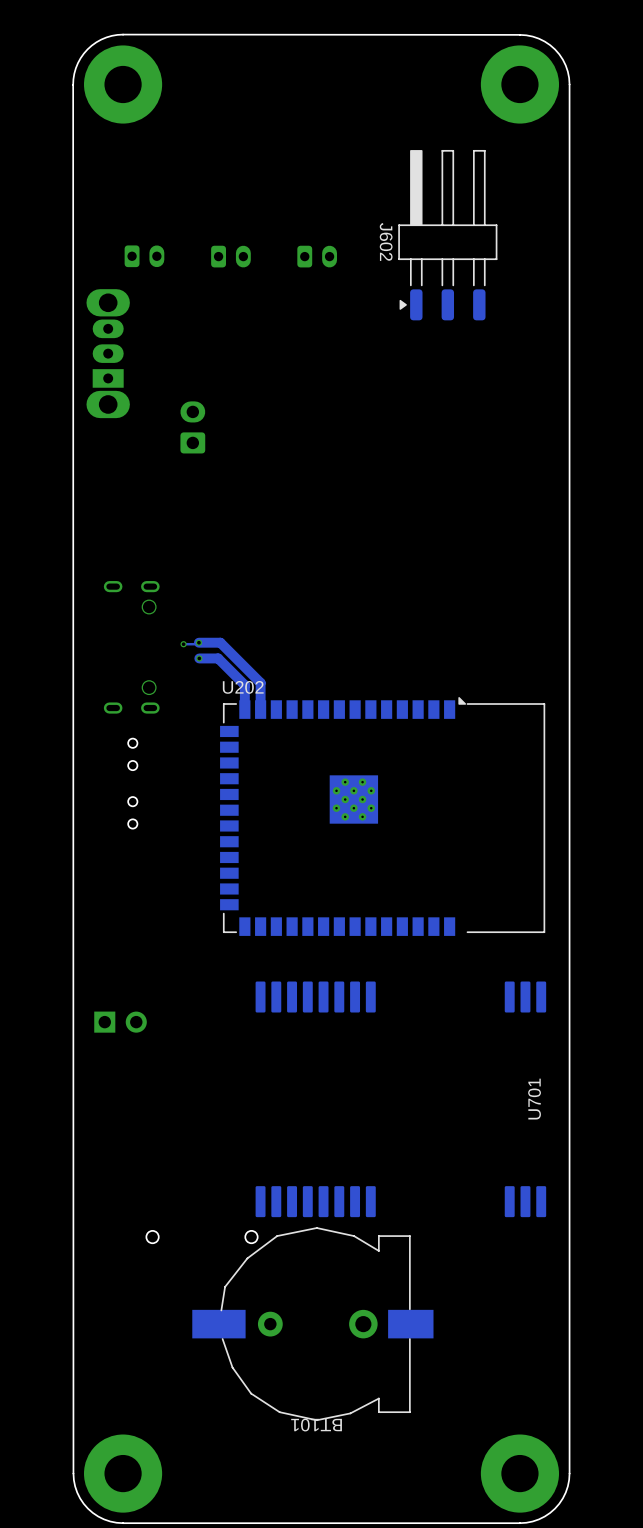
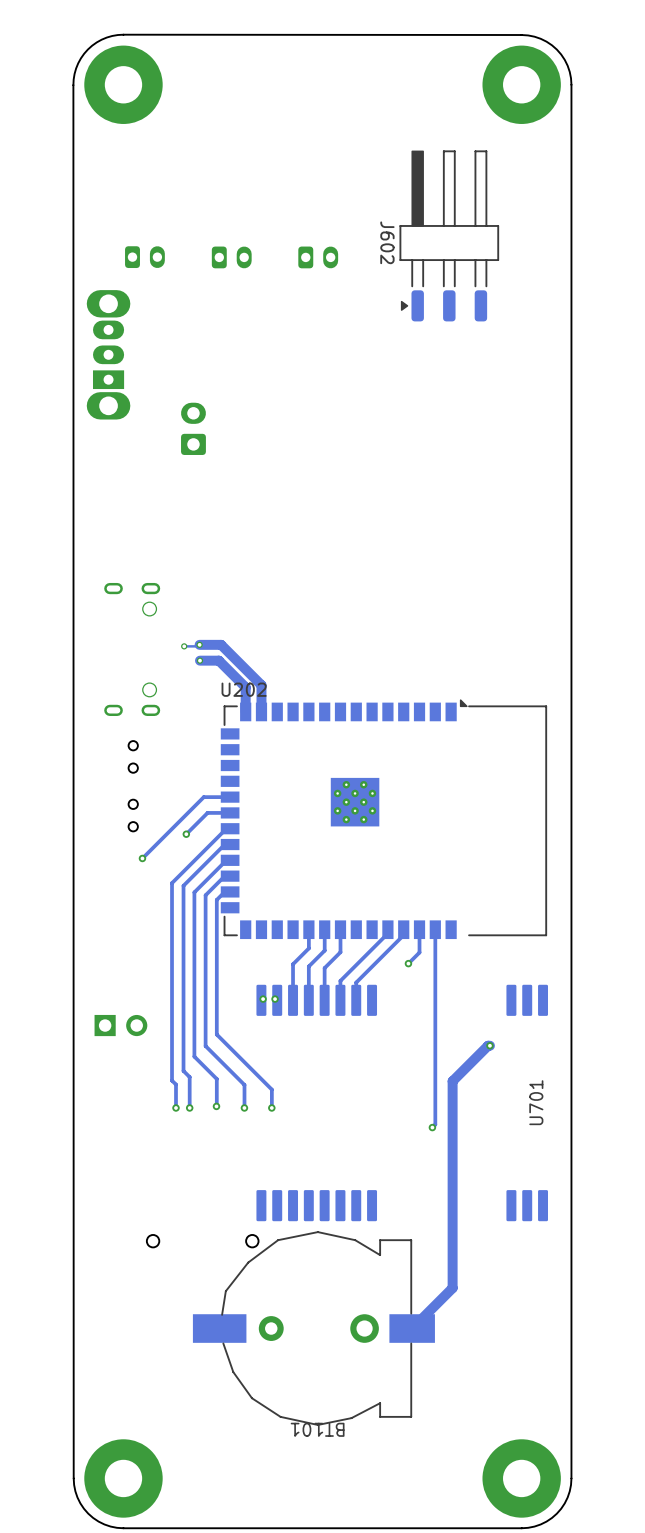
track: none -> (230, 797) (203, 797) (142, 858)
track: none -> (230, 812) (207, 812) (186, 834)
track: none -> (230, 828) (226, 828) (172, 883) (172, 1080) (175, 1084) (175, 1107)
via: none -> (186, 834)
track: none -> (230, 844) (224, 844) (183, 885) (183, 1070) (189, 1077) (189, 1107)
via: none -> (142, 858)
track: none -> (230, 860) (226, 860) (194, 892) (194, 1056) (216, 1079) (216, 1106)
track: none -> (230, 876) (224, 876) (205, 895) (205, 1046) (244, 1084) (244, 1107)
track: none -> (230, 891) (224, 891) (216, 899) (216, 1034) (271, 1089) (271, 1107)
track: none -> (308, 929) (308, 948) (293, 964) (293, 1000)
track: none -> (324, 929) (324, 950) (308, 966) (308, 1000)
track: none -> (340, 929) (340, 952) (324, 968) (324, 1000)
track: none -> (387, 929) (387, 933) (340, 980) (340, 1000)
track: none -> (403, 929) (403, 935) (356, 982) (356, 1000)
track: none -> (419, 929) (419, 952) (408, 963)
track: none -> (435, 929) (435, 1124) (432, 1127)
via: none -> (408, 963)
via: none -> (263, 999)
via: none -> (275, 999)
track: none -> (489, 1045) (452, 1081) (452, 1288) (412, 1328)
via: none -> (489, 1045)
via: none -> (216, 1106)
via: none -> (175, 1107)
via: none -> (189, 1107)
via: none -> (244, 1107)
via: none -> (271, 1107)
via: none -> (432, 1127)

